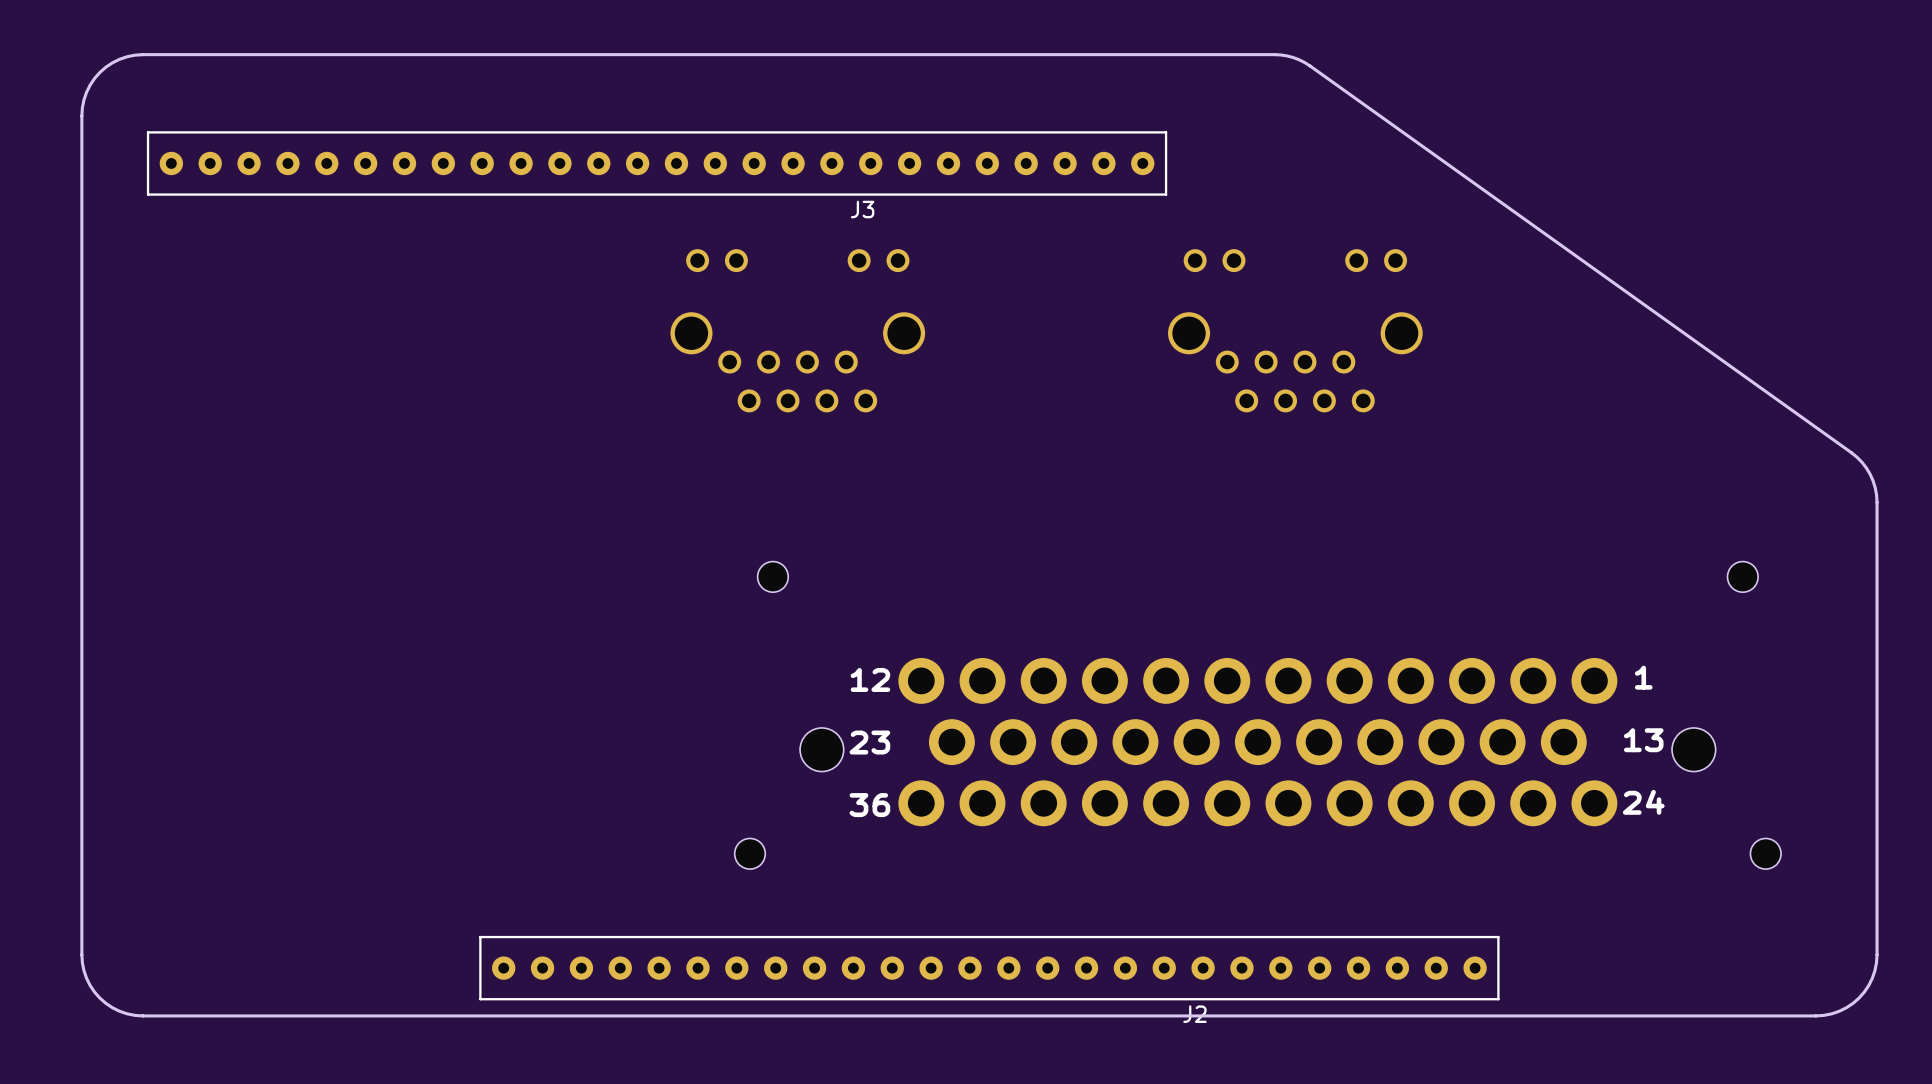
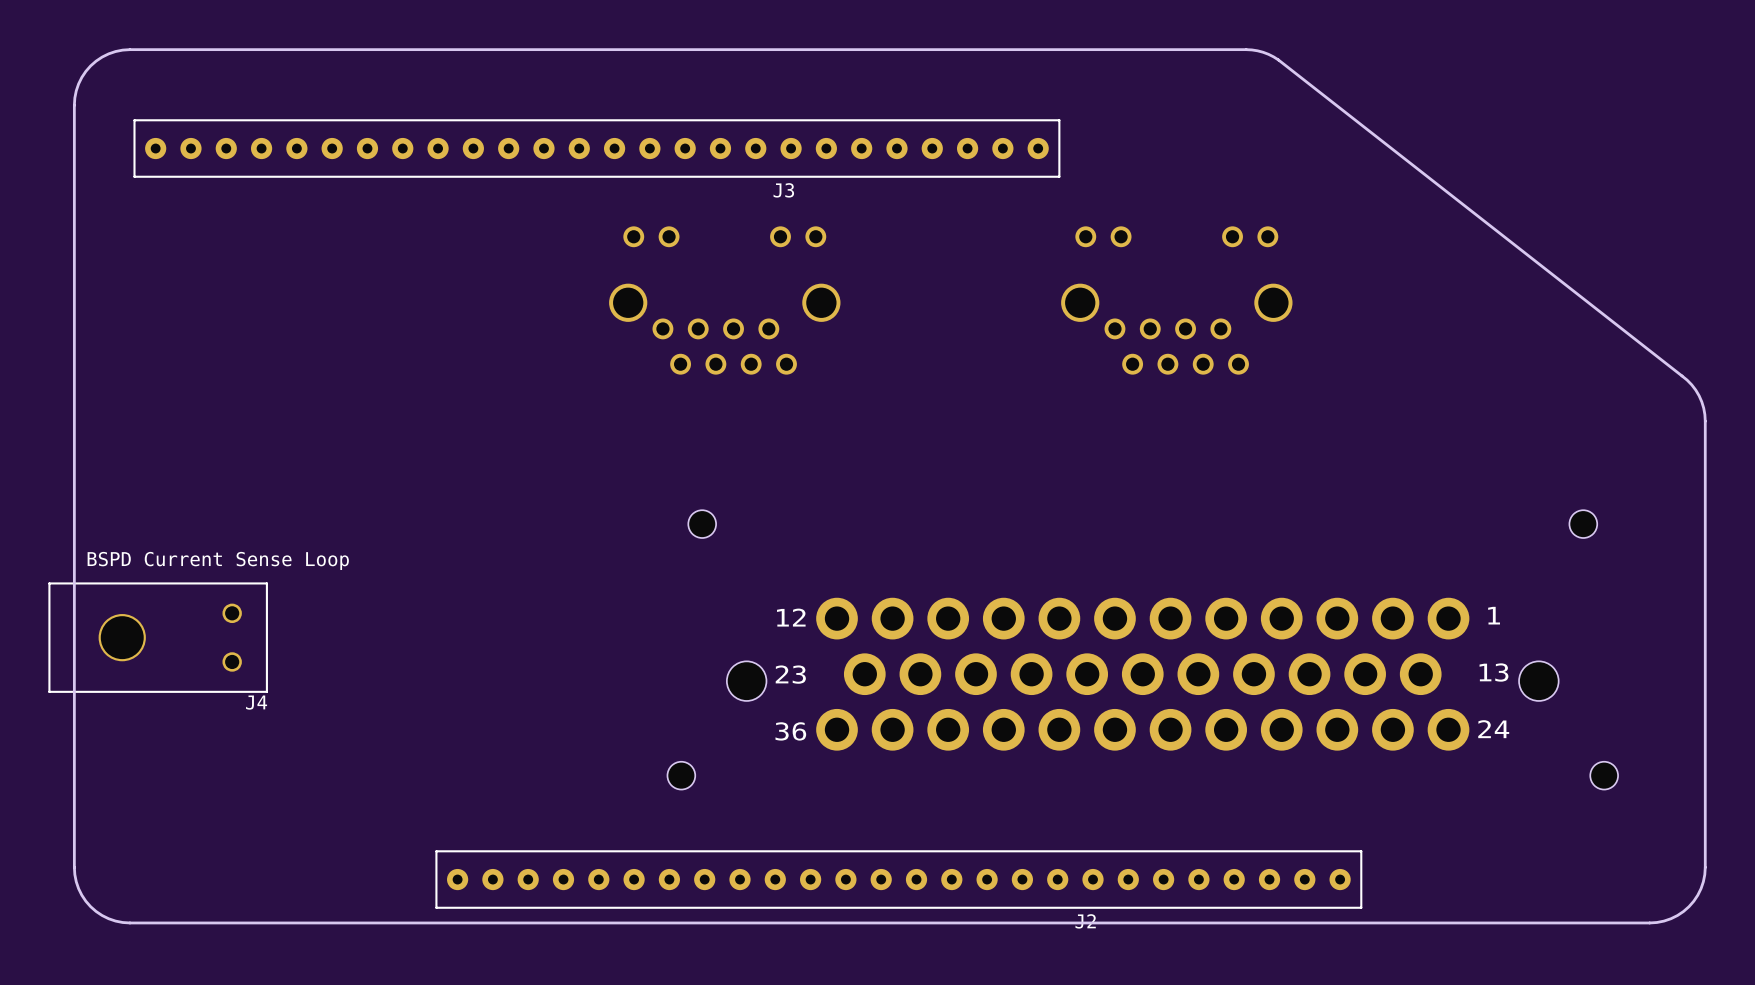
board edge: (143, 54) (1287, 55) (1310, 66) (1851, 452) (1862, 462) (1870, 474) (1875, 488) (1877, 502) -> (129, 49) (1257, 50) (1278, 59) (1687, 380) (1695, 390) (1703, 408) (1705, 456)
text: none -> BSPD Current Sense Loop (218, 560)
J4: none -> (158, 637)

